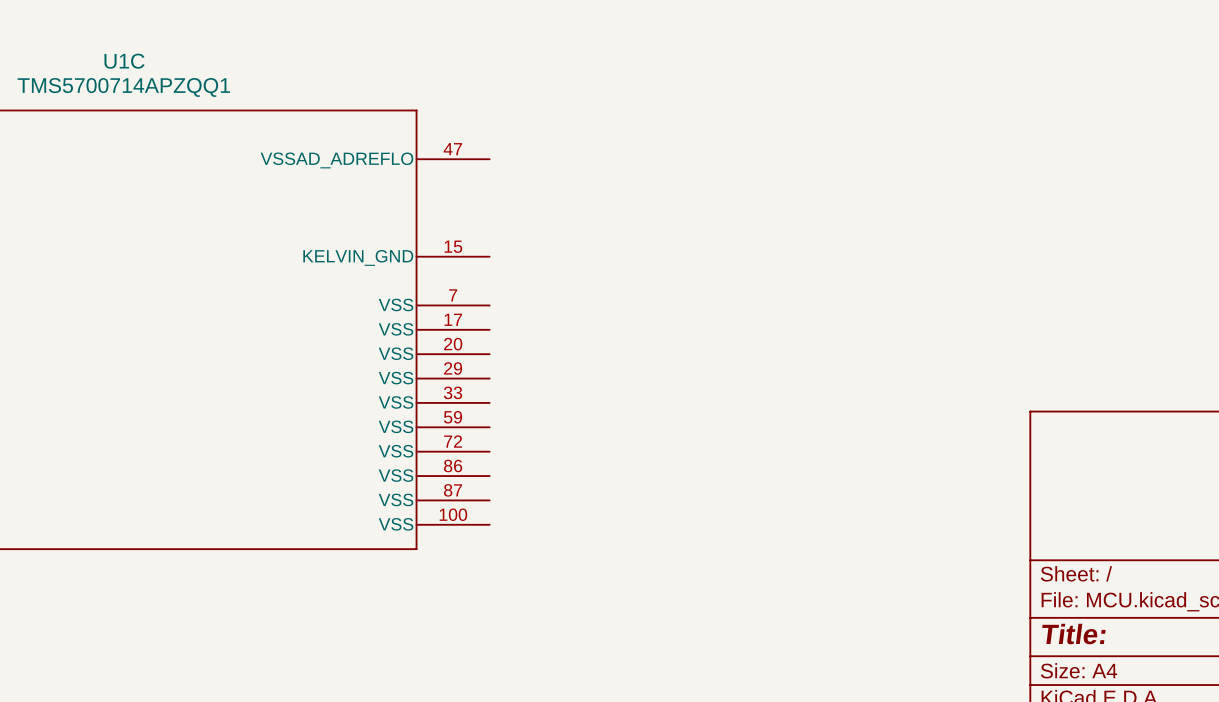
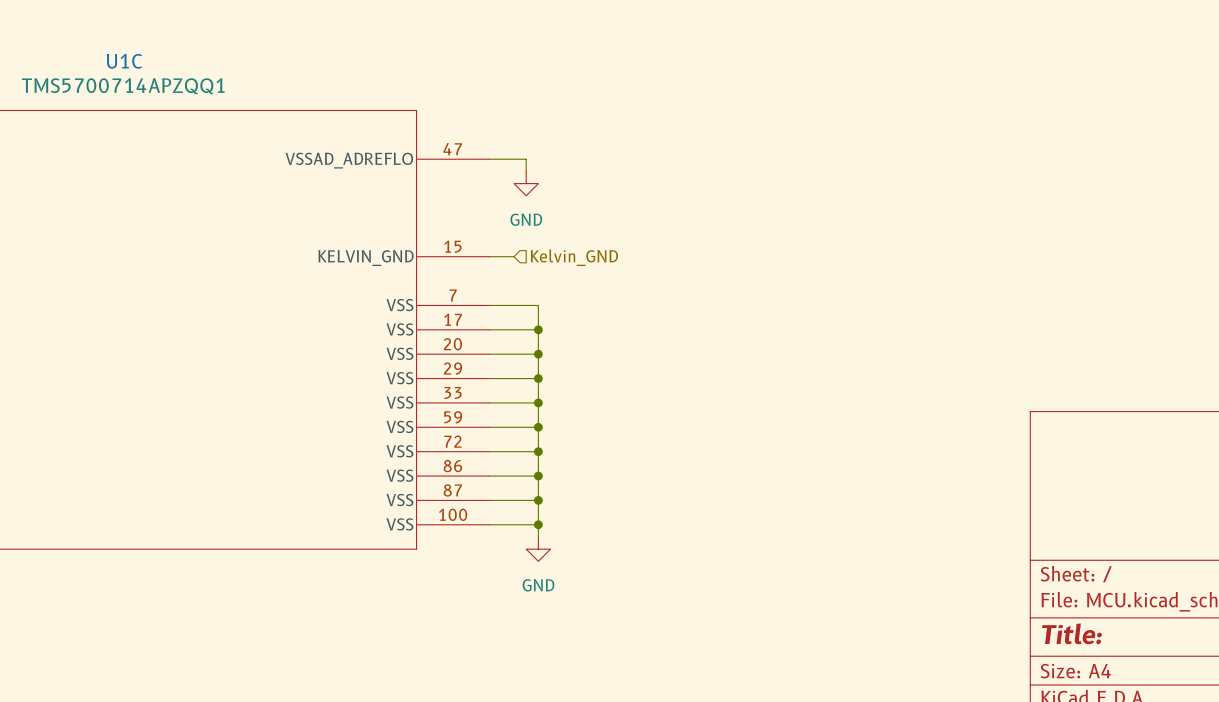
wire: none -> (489, 159) (526, 159) (526, 171)
power symbol: none -> GND (526, 183)
wire: none -> (489, 256) (514, 256)
hierarchical label: none -> Kelvin_GND (574, 257)
wire: none -> (489, 305) (538, 305) (538, 536)
wire: none -> (489, 329) (538, 329)
junction: none -> (538, 329)
wire: none -> (489, 354) (538, 354)
junction: none -> (538, 354)
wire: none -> (489, 378) (538, 378)
junction: none -> (538, 378)
wire: none -> (489, 402) (538, 402)
junction: none -> (538, 402)
wire: none -> (489, 427) (538, 427)
junction: none -> (538, 427)
wire: none -> (489, 451) (538, 451)
junction: none -> (538, 451)
wire: none -> (489, 476) (538, 476)
junction: none -> (538, 476)
wire: none -> (489, 500) (538, 500)
junction: none -> (538, 500)
wire: none -> (489, 524) (538, 524)
junction: none -> (538, 524)
power symbol: none -> GND (538, 549)

